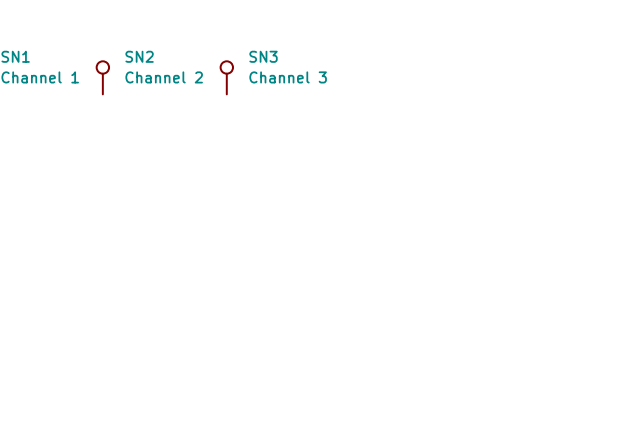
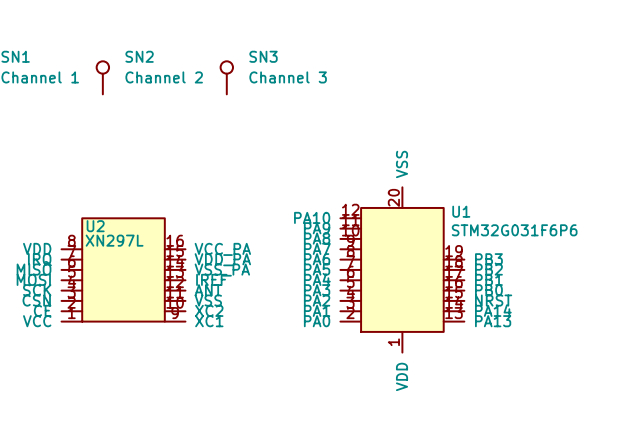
U2: none -> XN297L (123, 269)
U1: none -> STM32G031F6P6 (402, 269)

